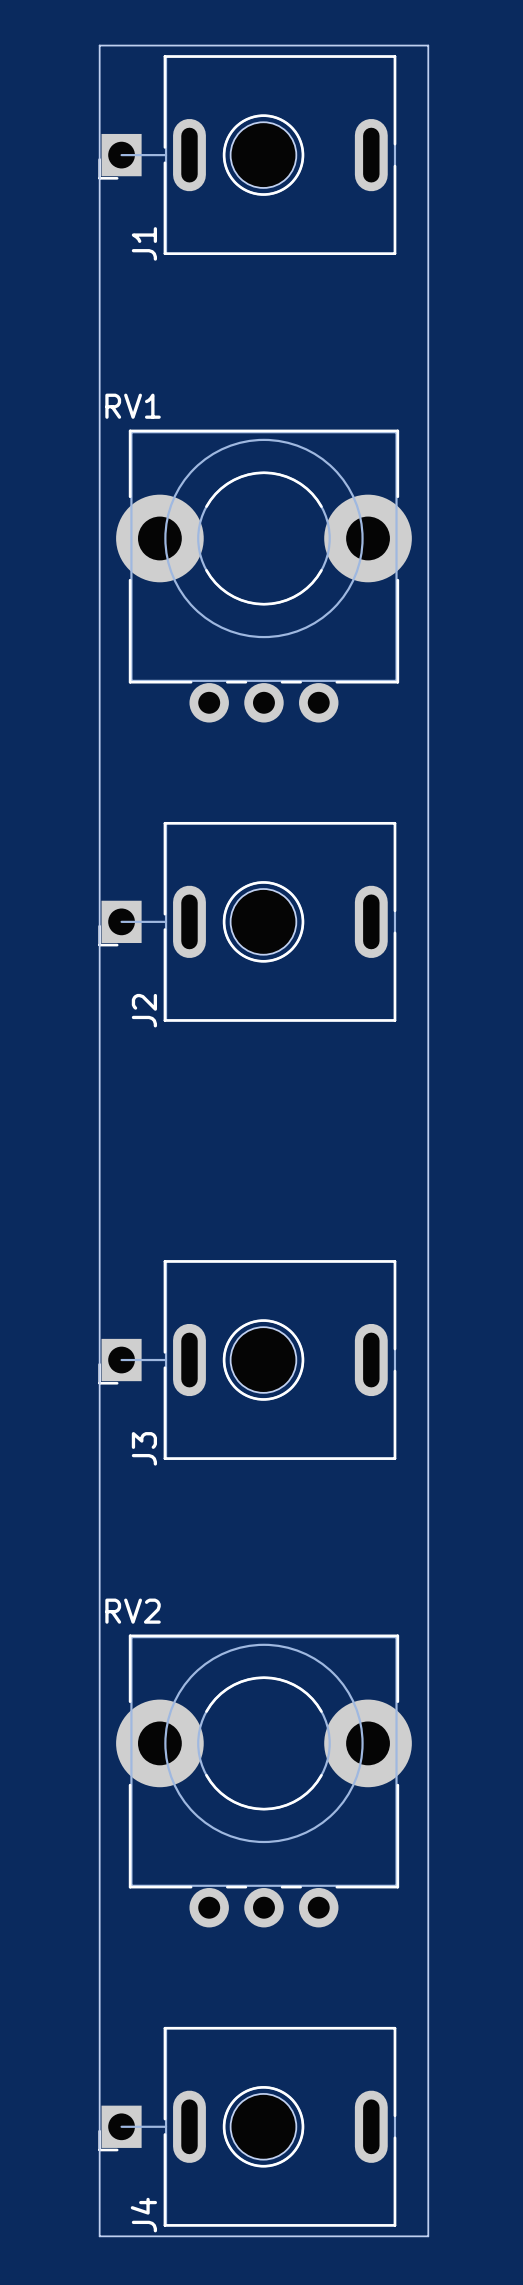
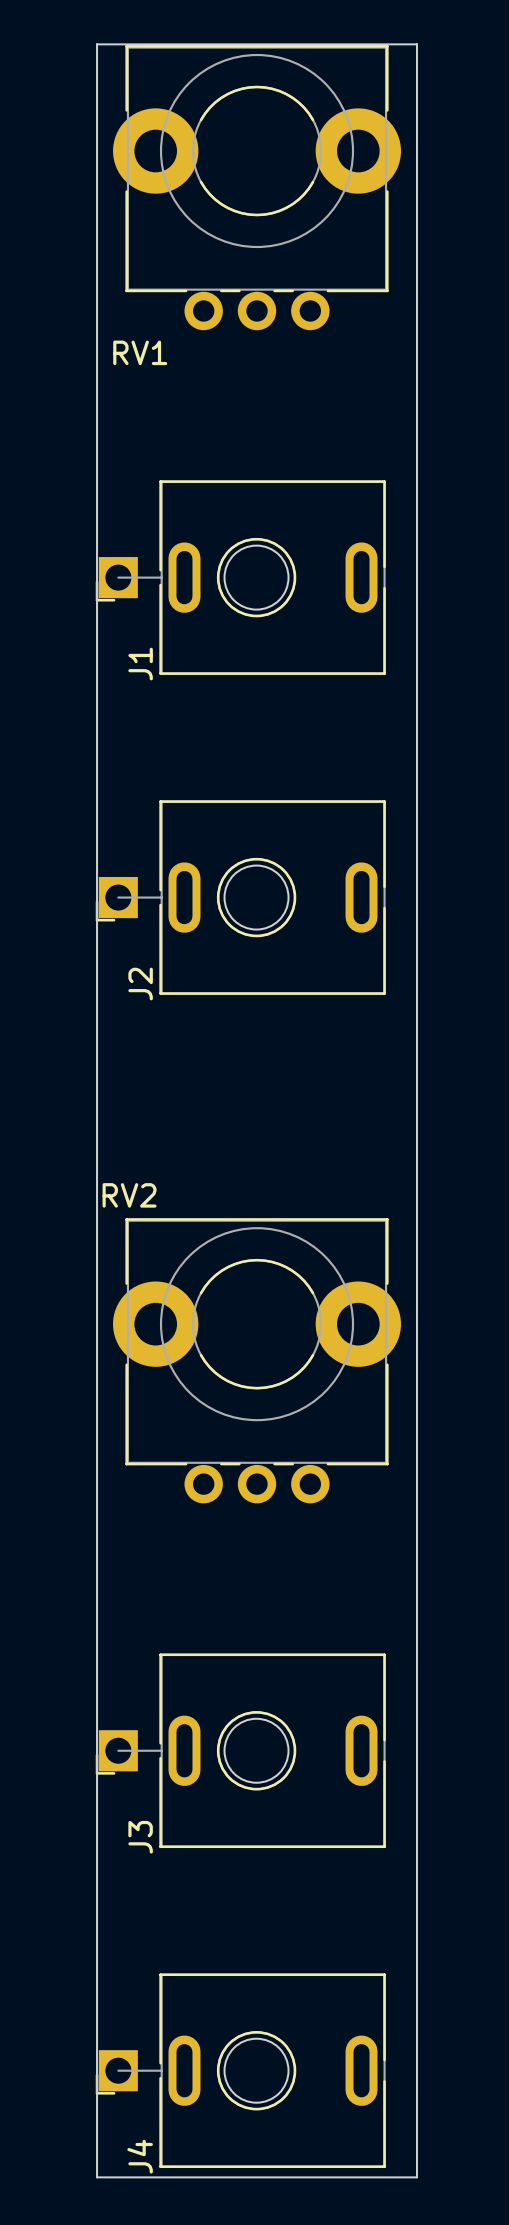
J1 position: (247, 155) -> (240, 577)
RV1 name position: RV1 (133, 406) -> RV1 (140, 352)
RV1 position: (263, 576) -> (257, 187)
J3 position: (247, 1360) -> (240, 1750)
RV2 position: (263, 1780) -> (257, 1360)

